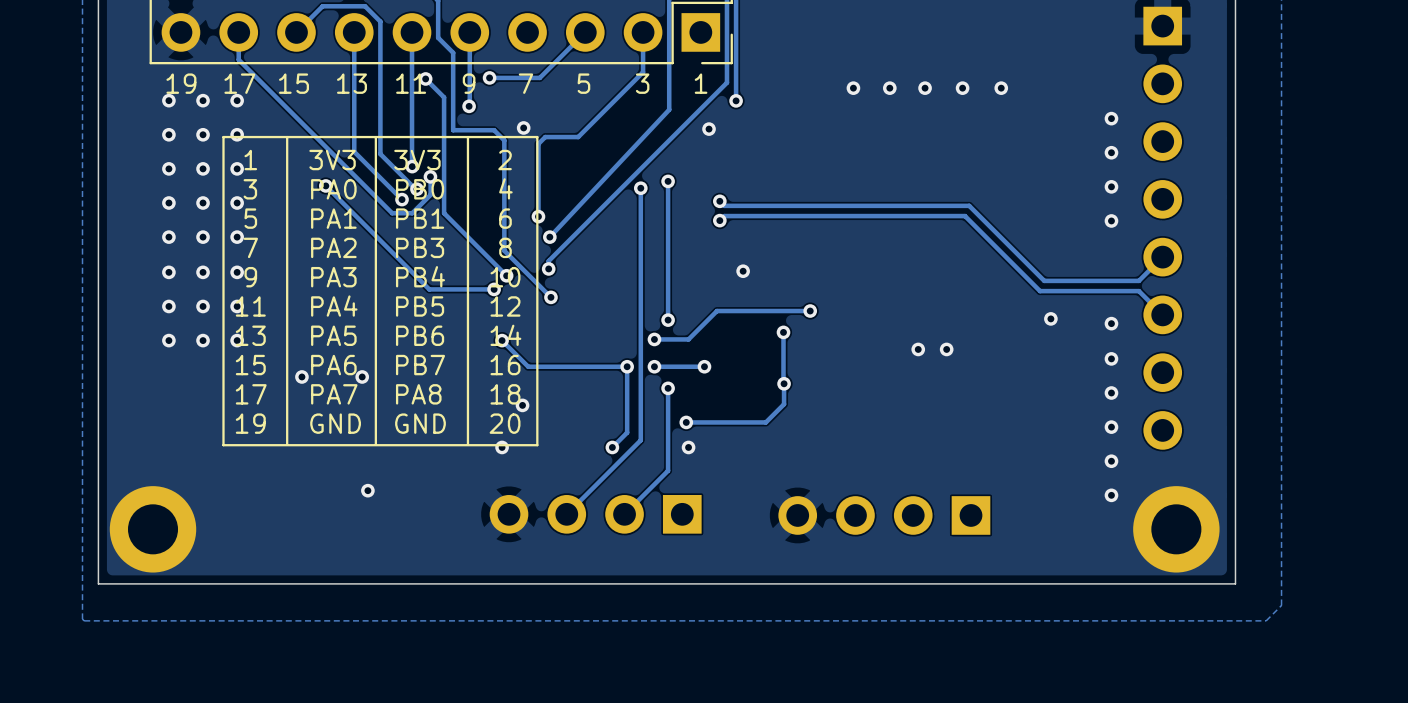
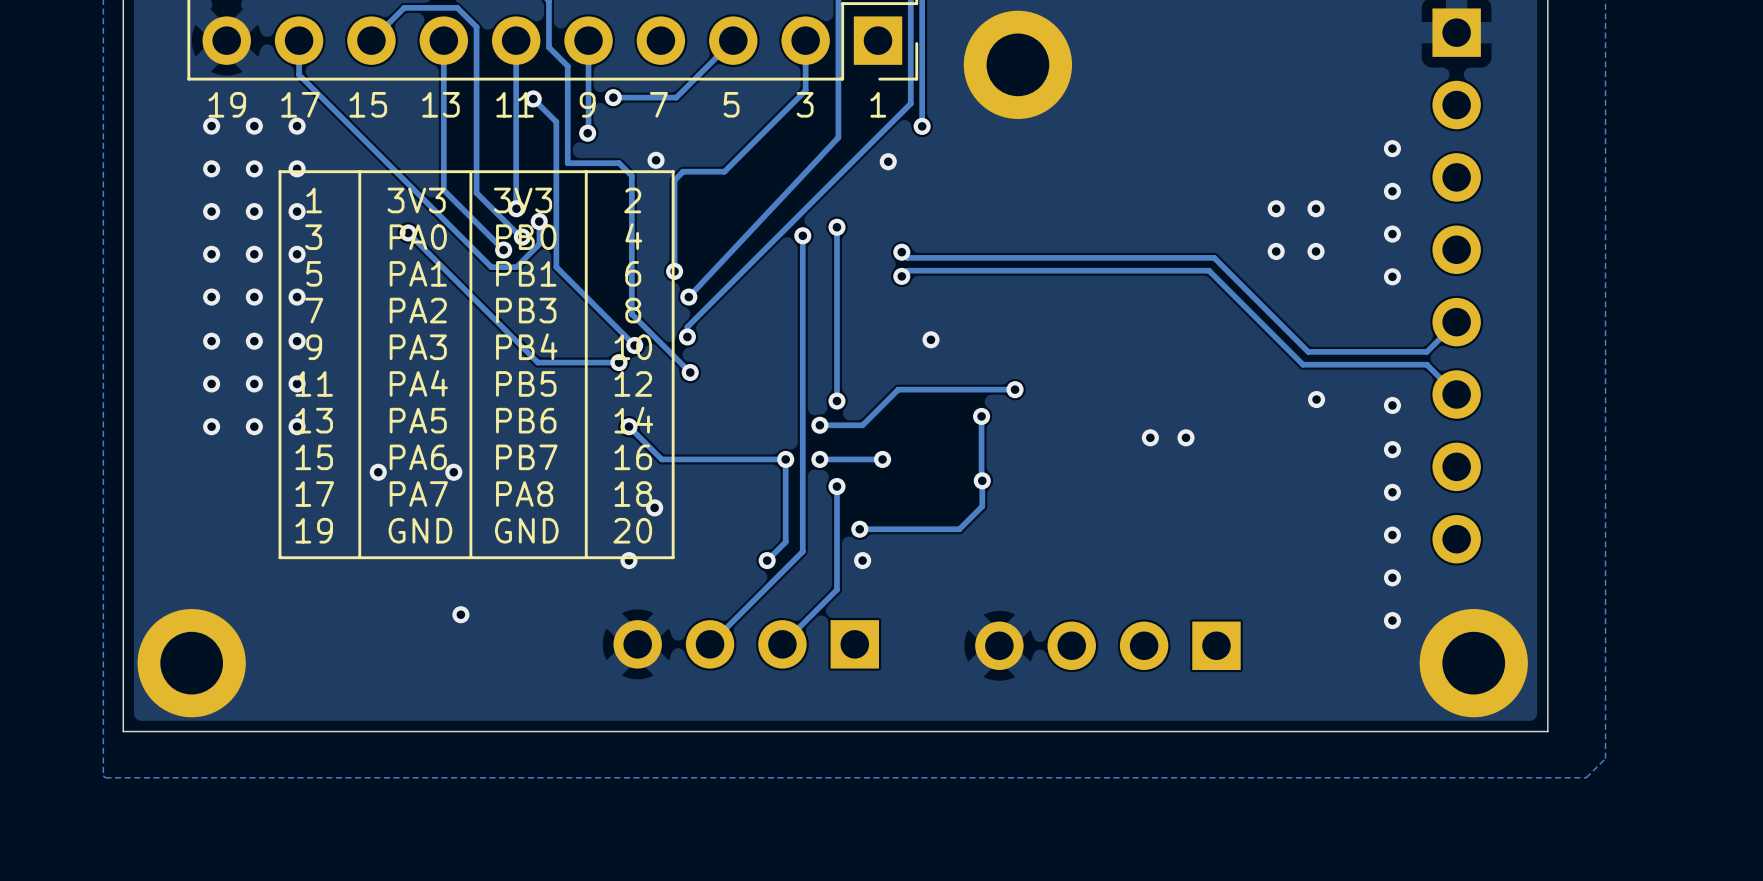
part: none -> (1017, 64)
via: (853, 88) -> none
via: (889, 88) -> none
via: (925, 88) -> none
via: (962, 88) -> none
via: (1001, 88) -> none
via: none -> (1276, 208)
via: none -> (1316, 208)
via: none -> (1276, 251)
via: none -> (1316, 251)

